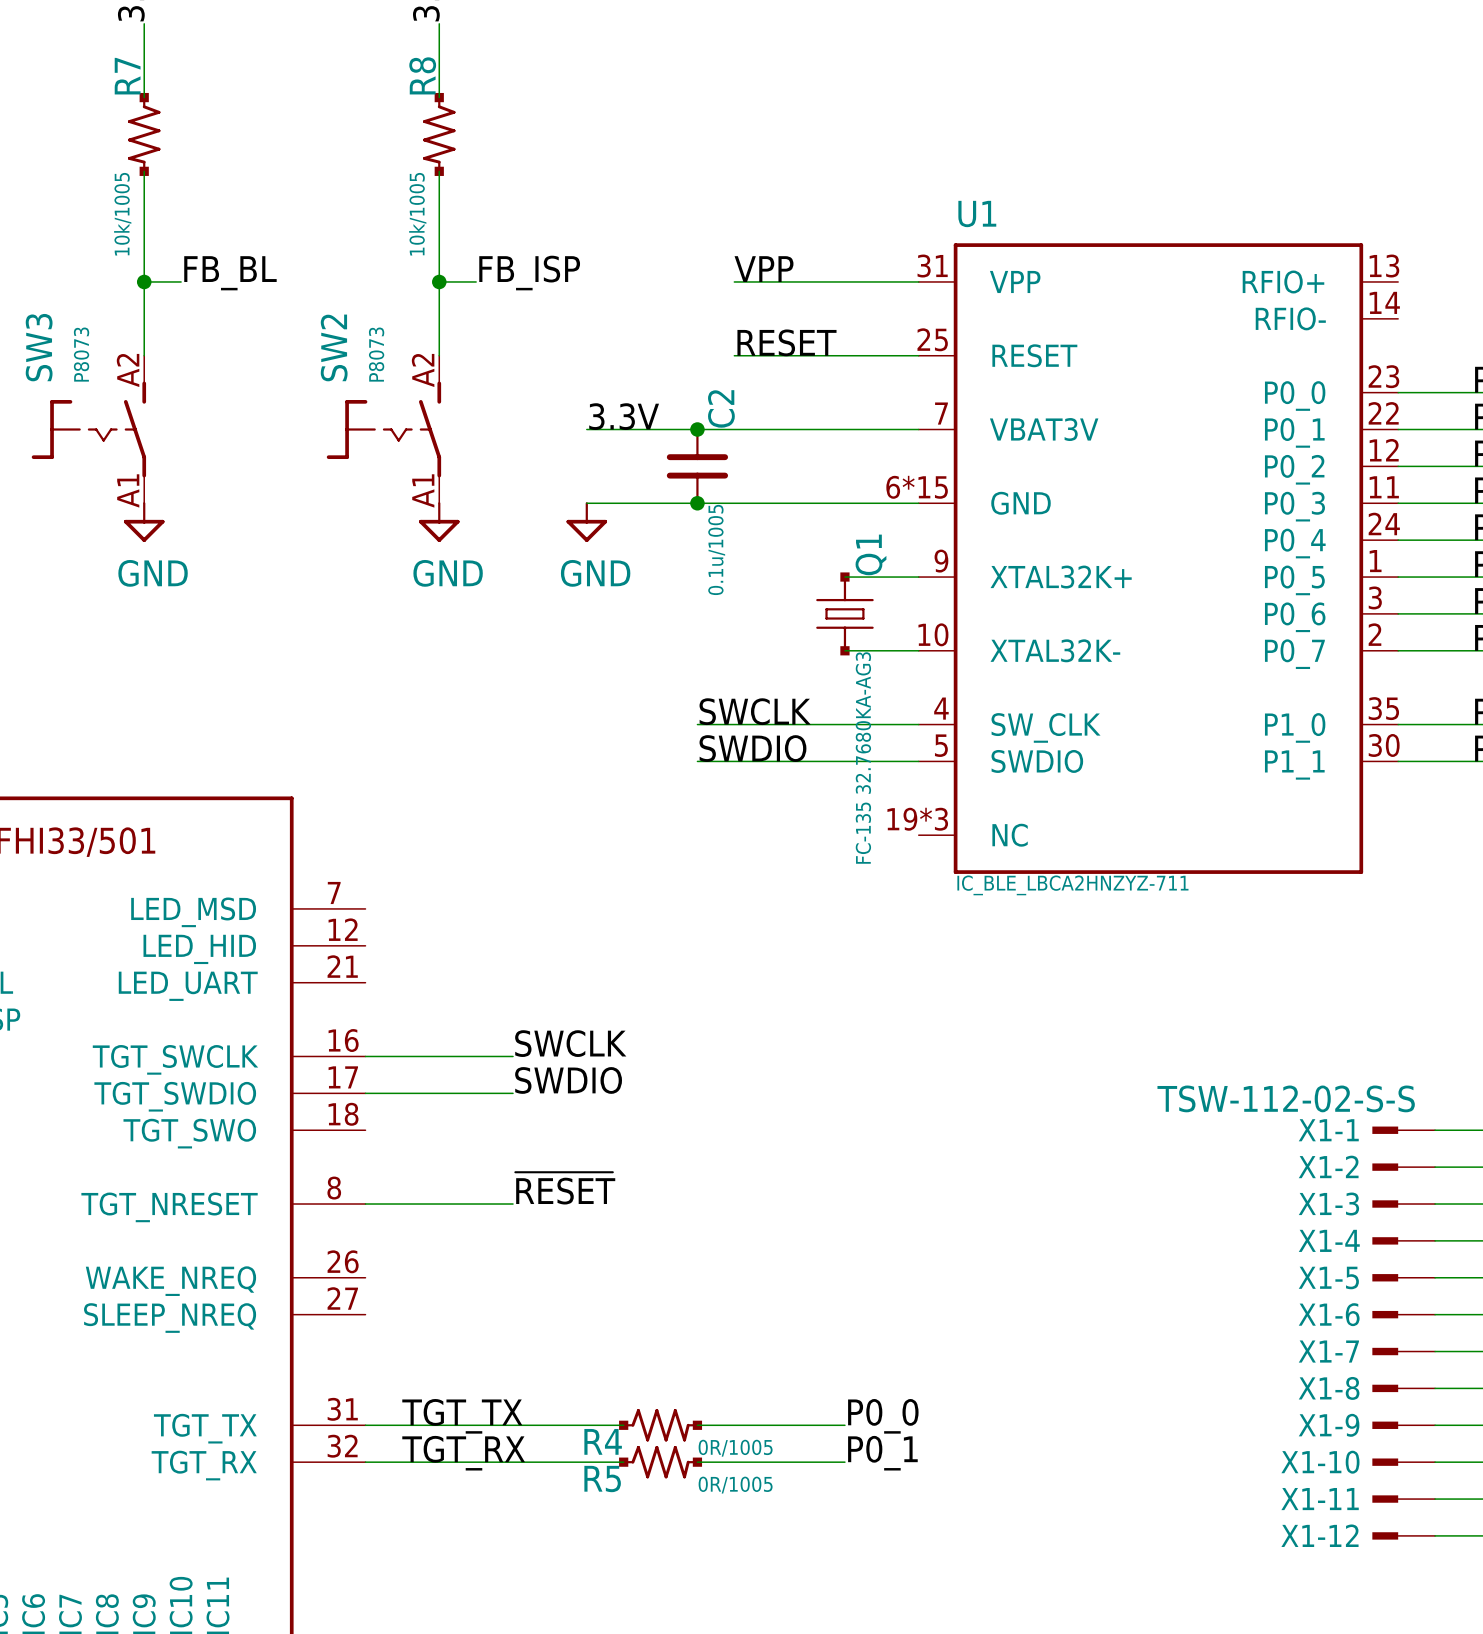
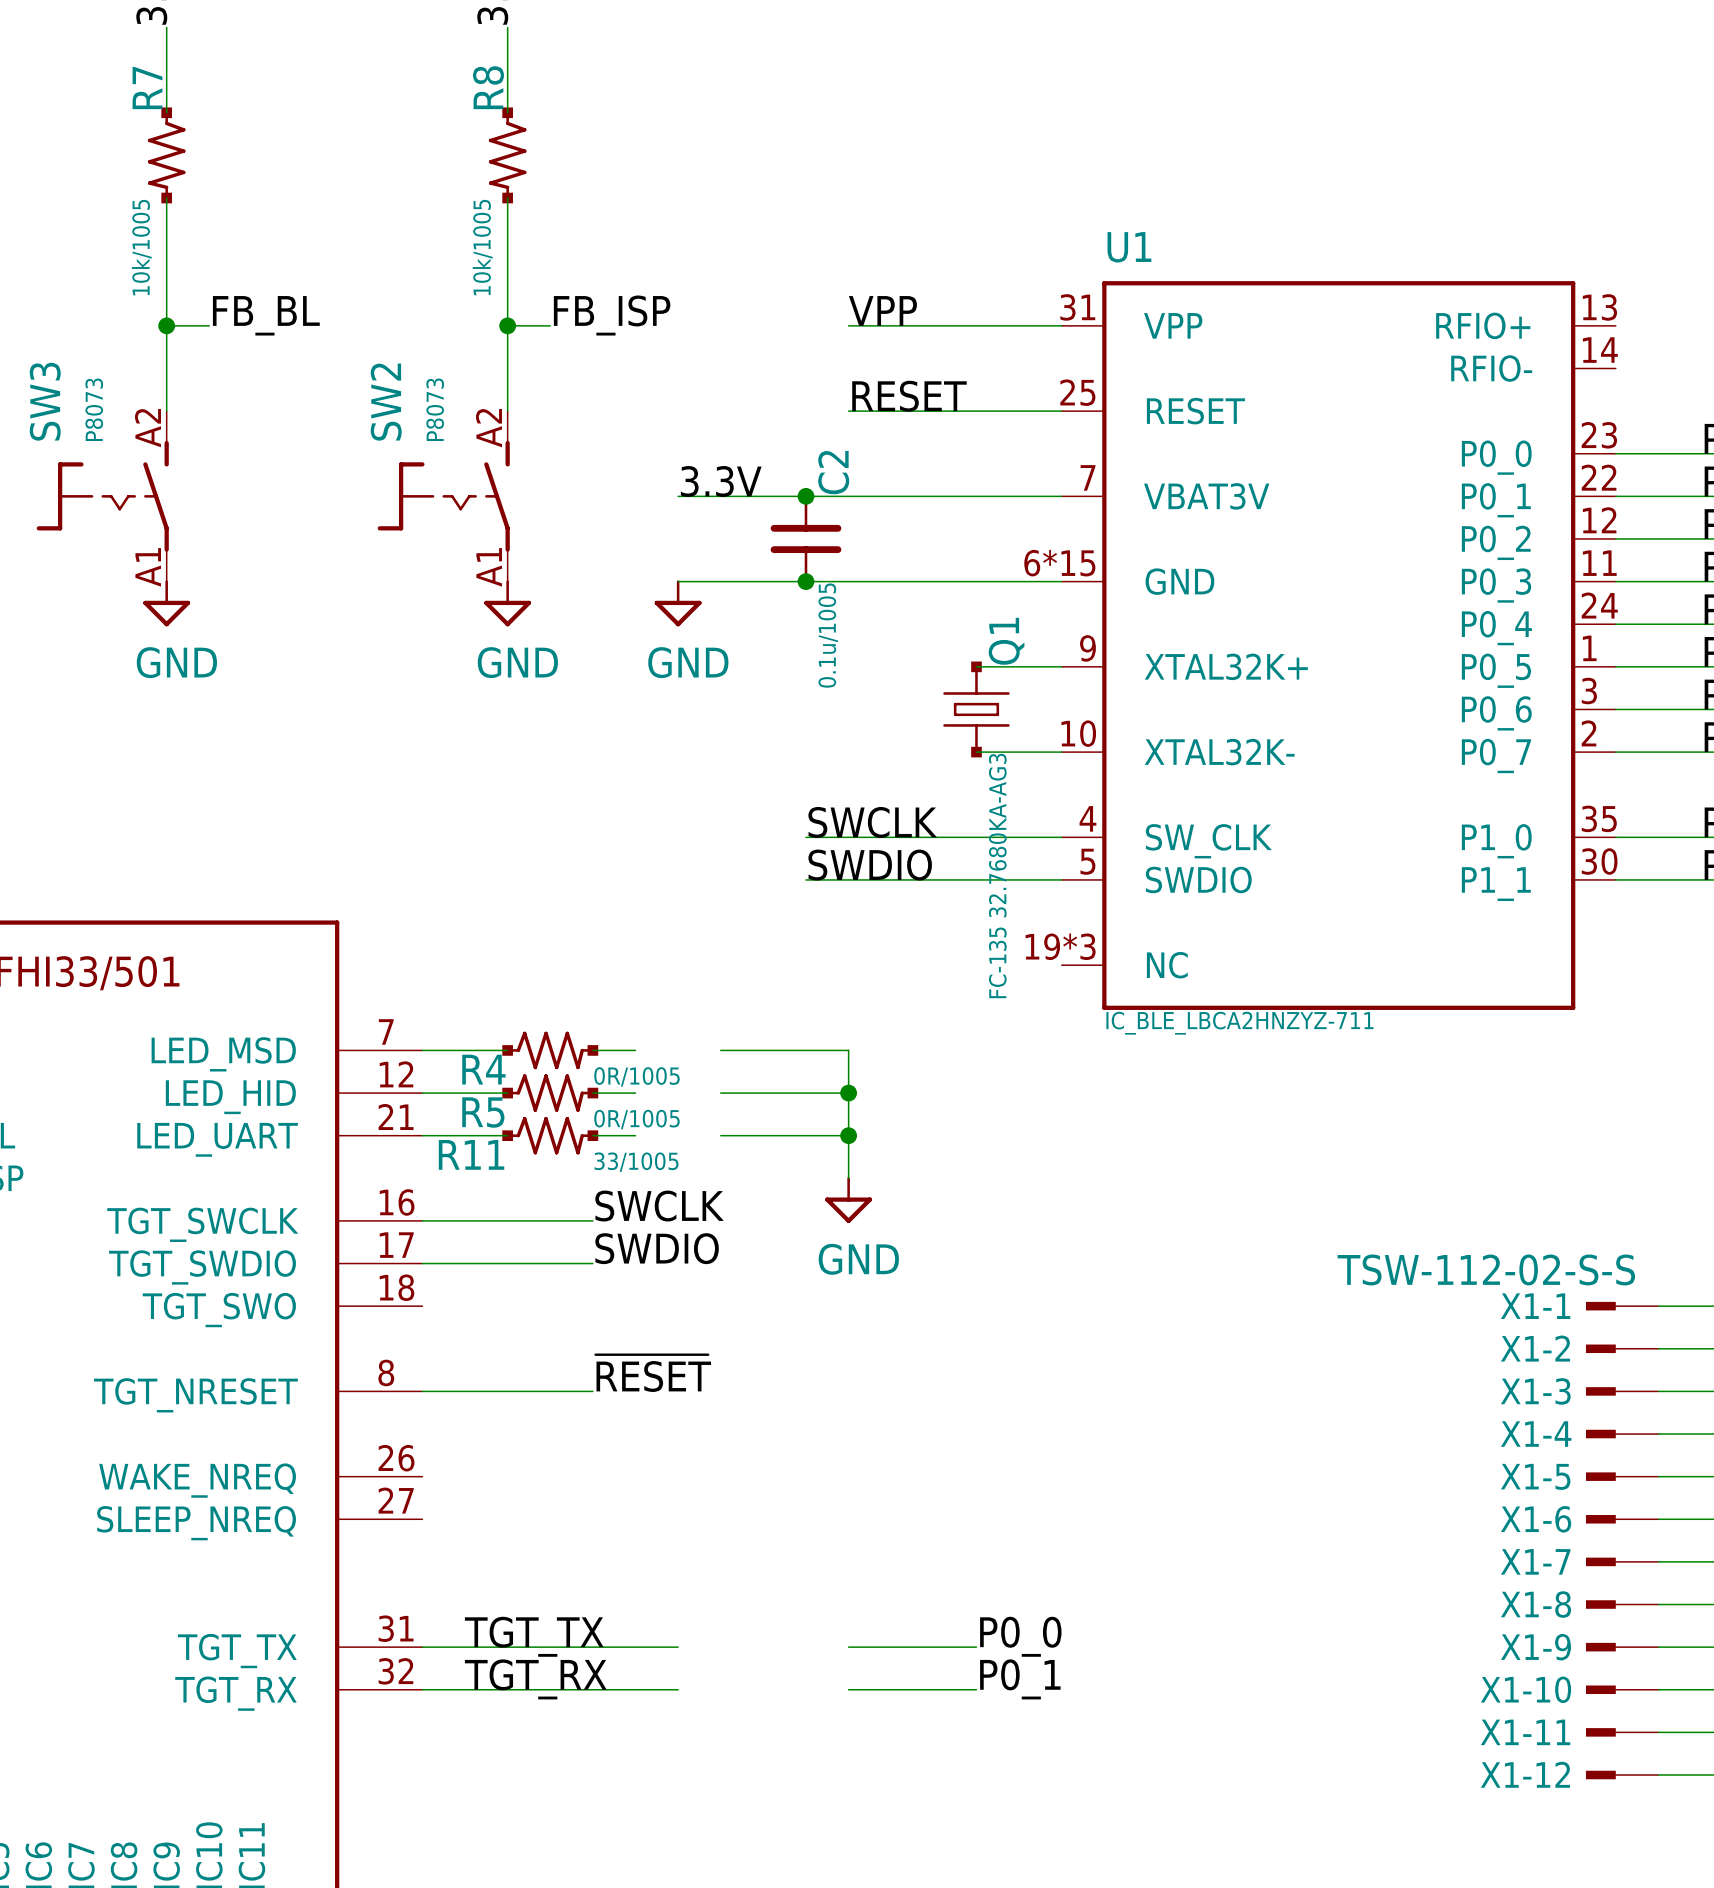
wire: none -> (422, 1050) (507, 1050)
wire: none -> (592, 1050) (635, 1050)
wire: none -> (720, 1050) (848, 1050) (848, 1178)
wire: none -> (422, 1093) (507, 1093)
wire: none -> (592, 1093) (635, 1093)
wire: none -> (720, 1093) (848, 1093)
junction: none -> (848, 1093)
wire: none -> (422, 1135) (507, 1135)
R11: none -> 33/1005 (550, 1135)
wire: none -> (592, 1135) (635, 1135)
wire: none -> (720, 1135) (848, 1135)
junction: none -> (848, 1135)
power symbol: none -> GND (848, 1200)
wire: (586, 1425) (623, 1425) -> none
R4 position: (660, 1425) -> (550, 1050)
wire: (697, 1425) (734, 1425) -> none
wire: (586, 1462) (623, 1462) -> none
R5 position: (660, 1462) -> (550, 1093)
wire: (697, 1462) (734, 1462) -> none

